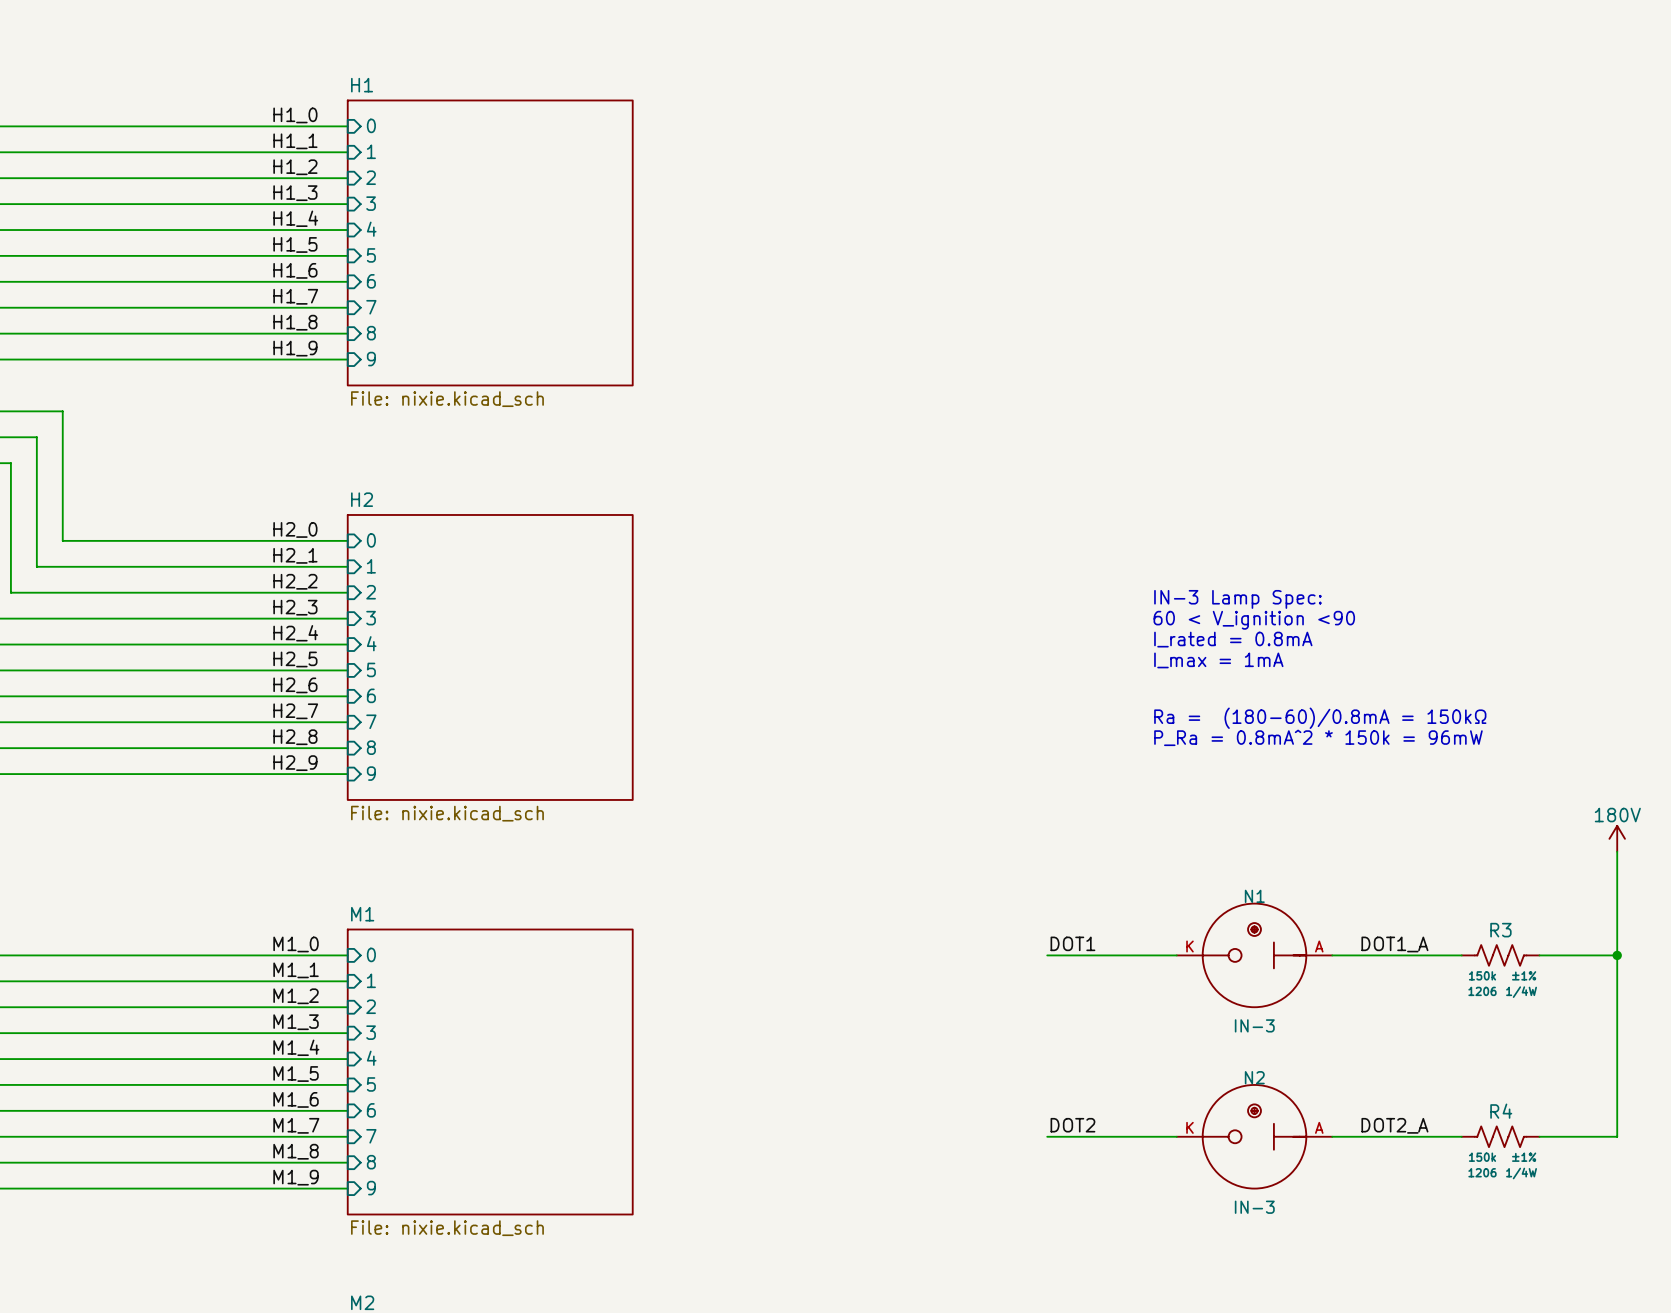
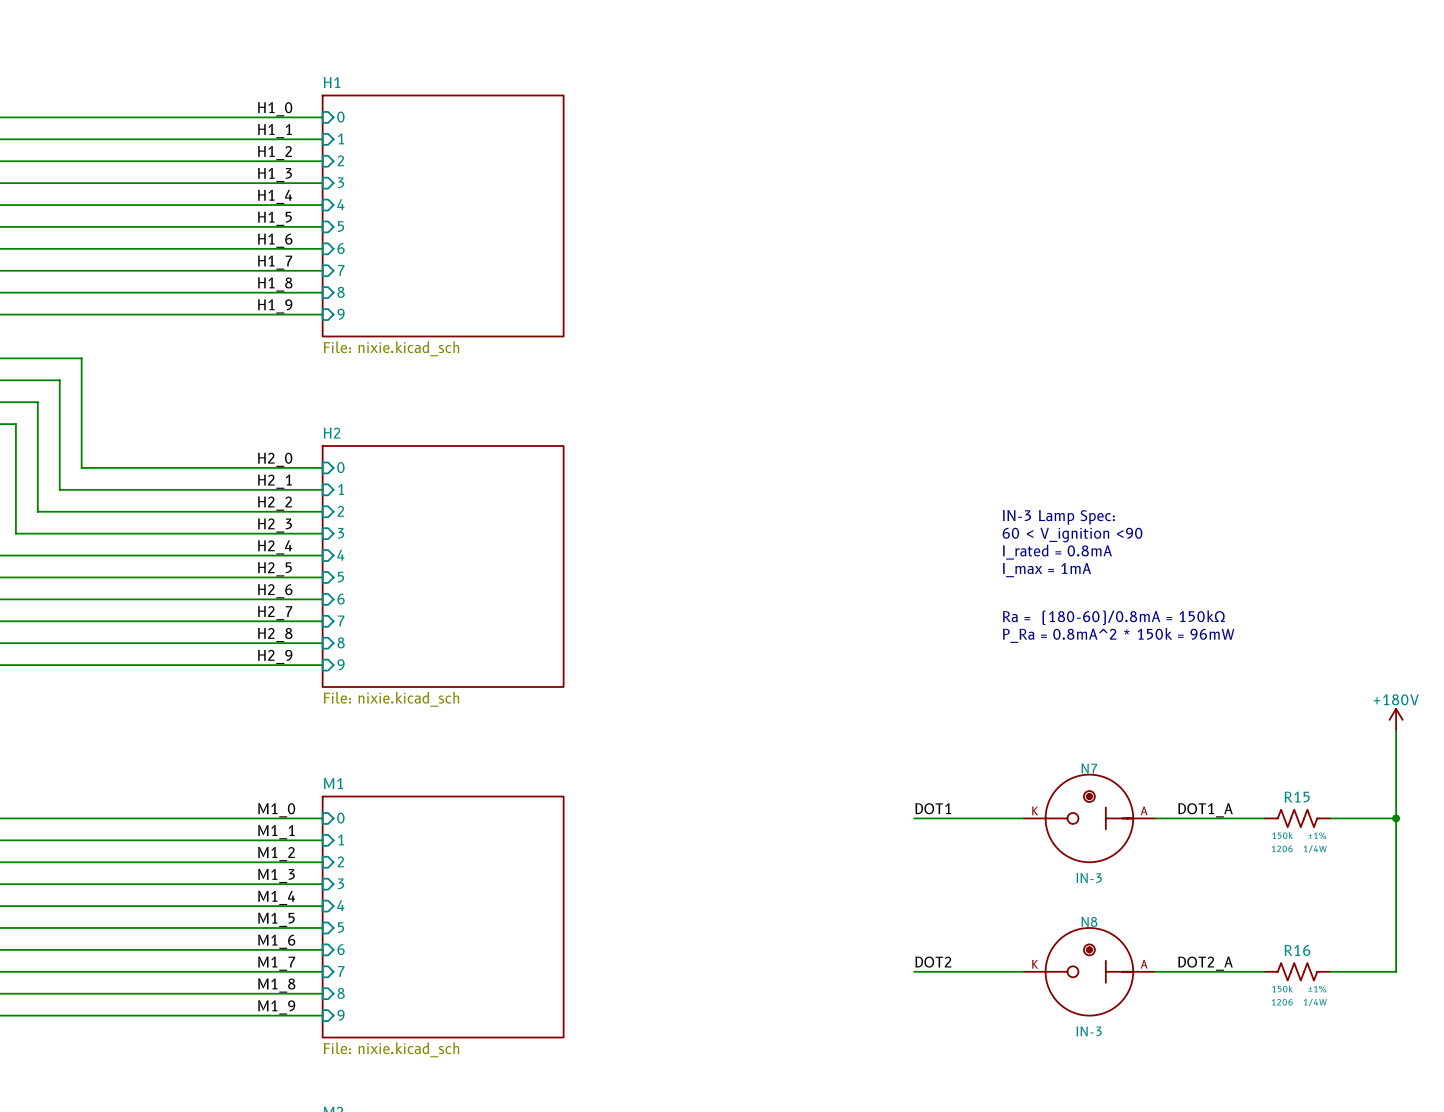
power symbol: 180V (1617, 838) -> +180V (1396, 719)
N1 name: N1 (1254, 896) -> N7 (1089, 768)
R3 name: R3 (1500, 930) -> R15 (1297, 797)
N2 name: N2 (1254, 1077) -> N8 (1089, 921)
R4 name: R4 (1501, 1111) -> R16 (1297, 950)

